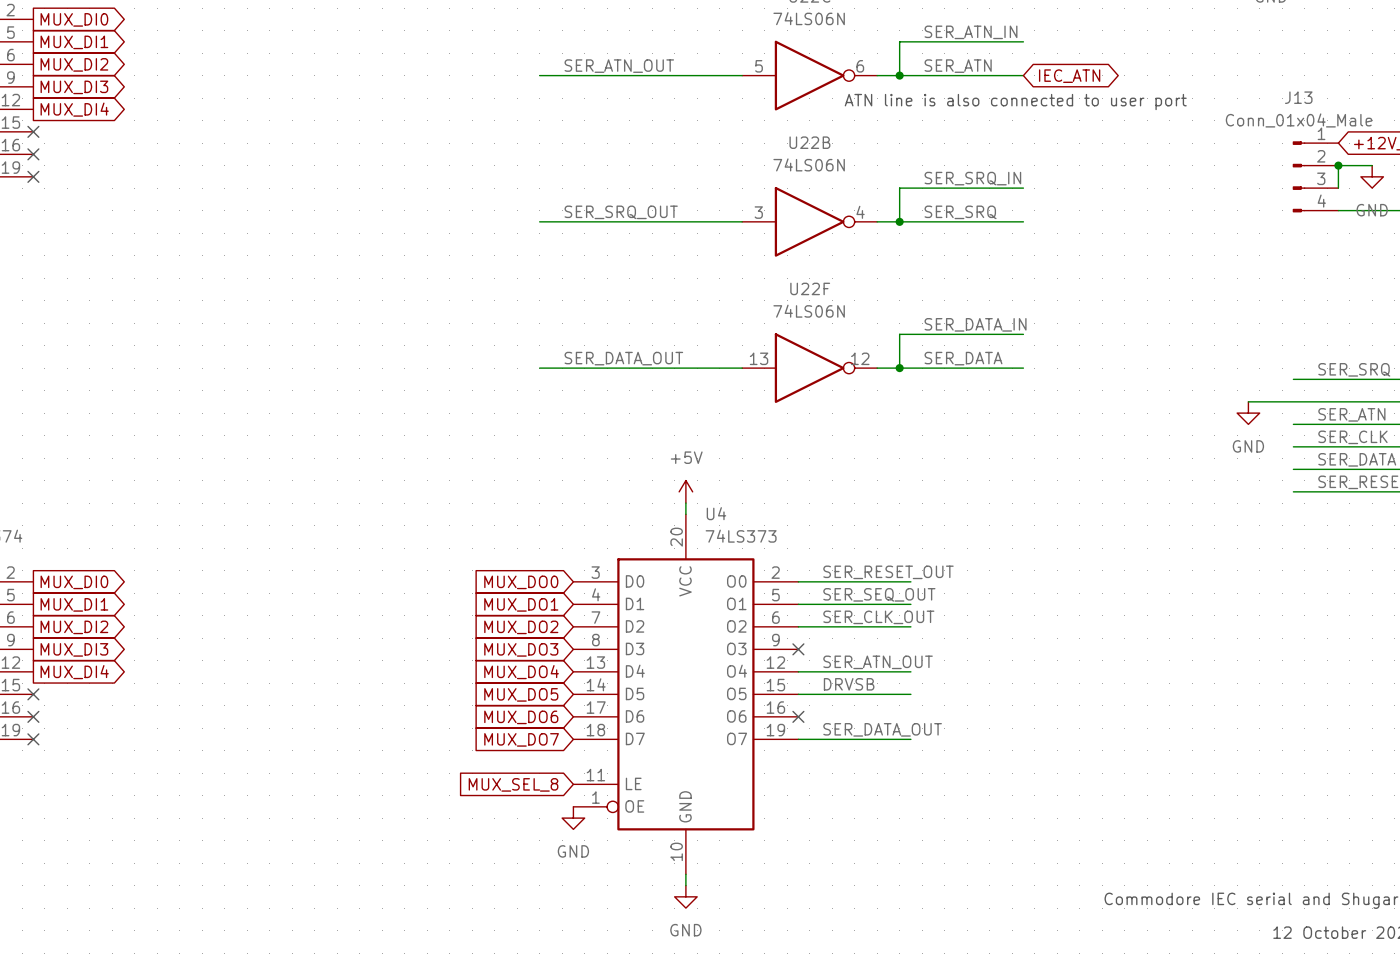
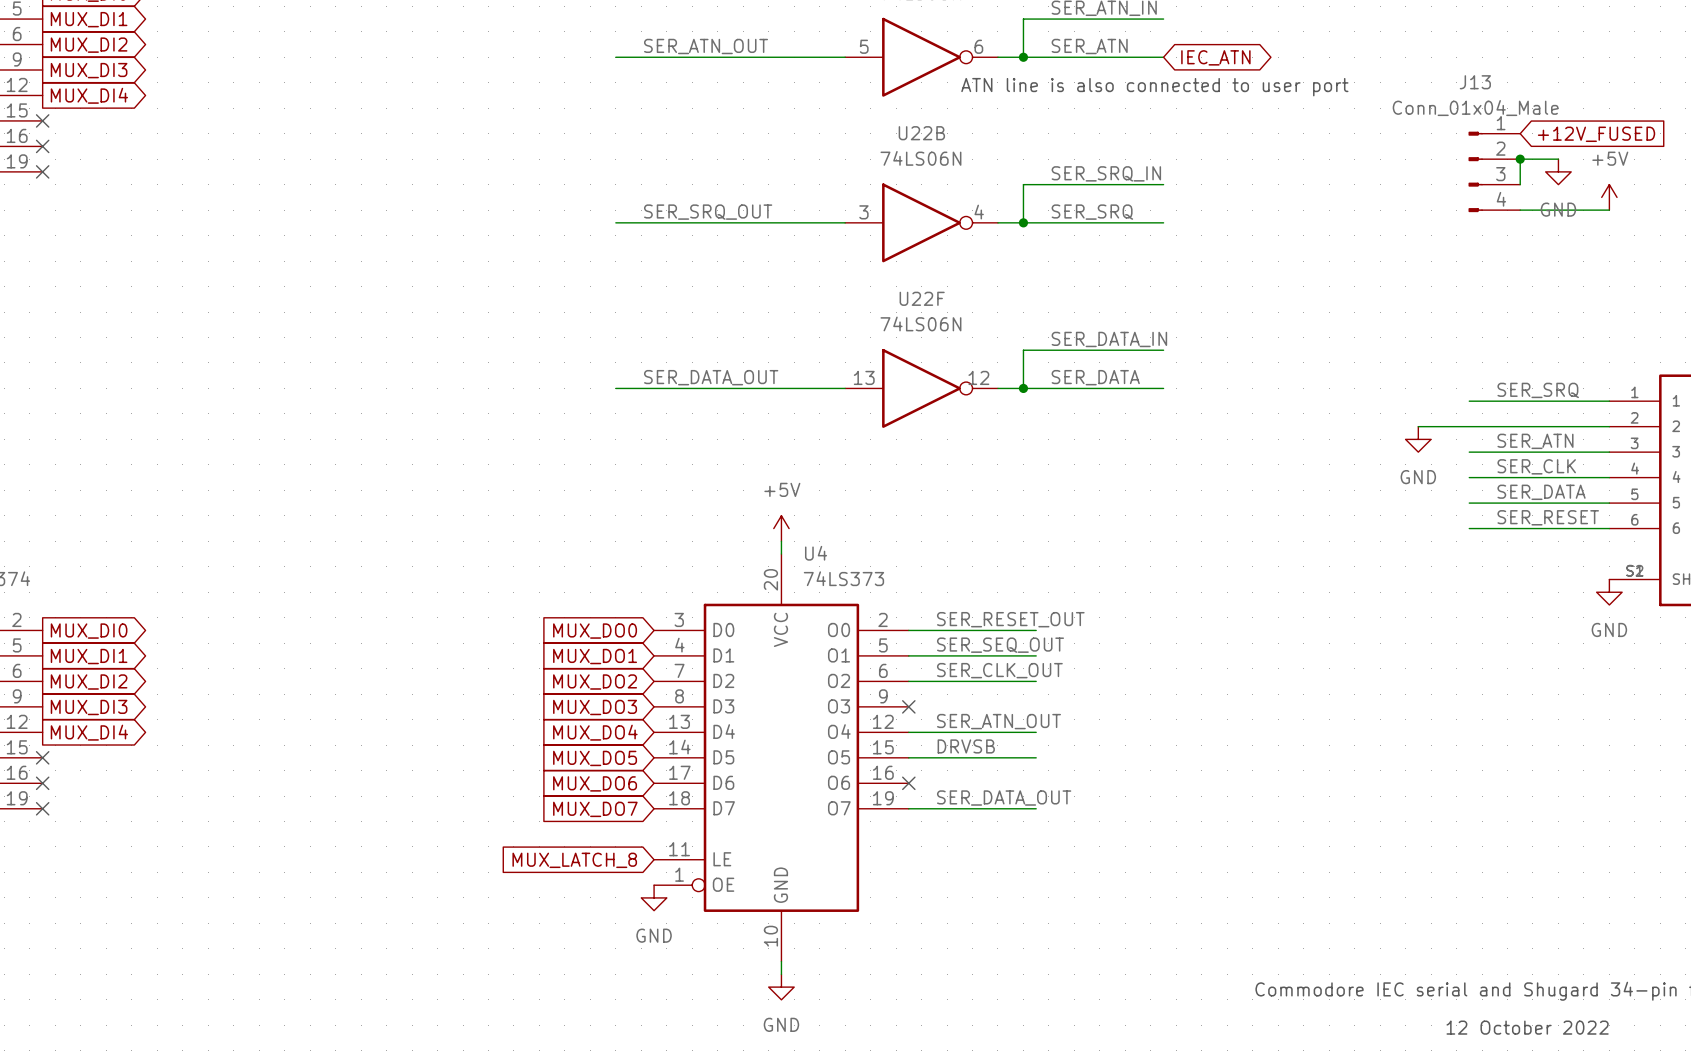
global label: MUX_SEL_8 (513, 784) -> MUX_LATCH_8 (574, 860)

